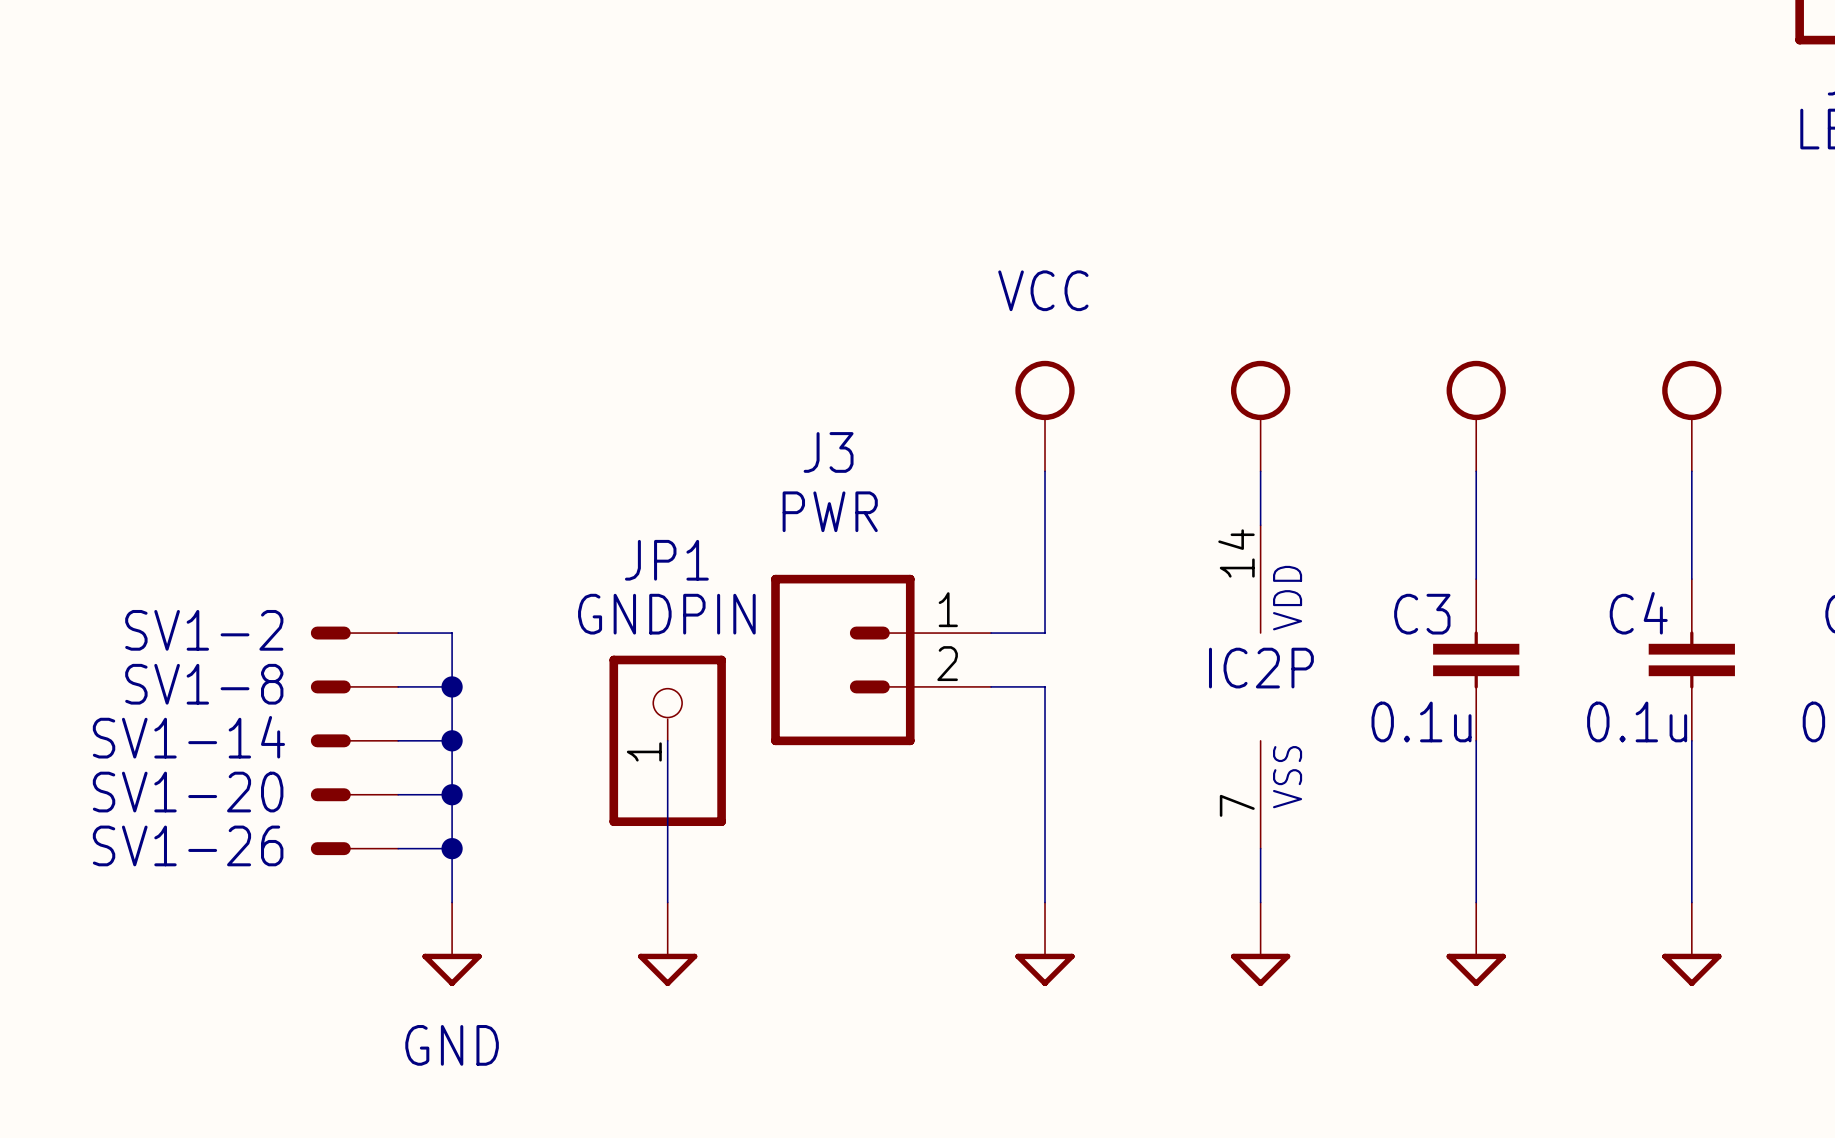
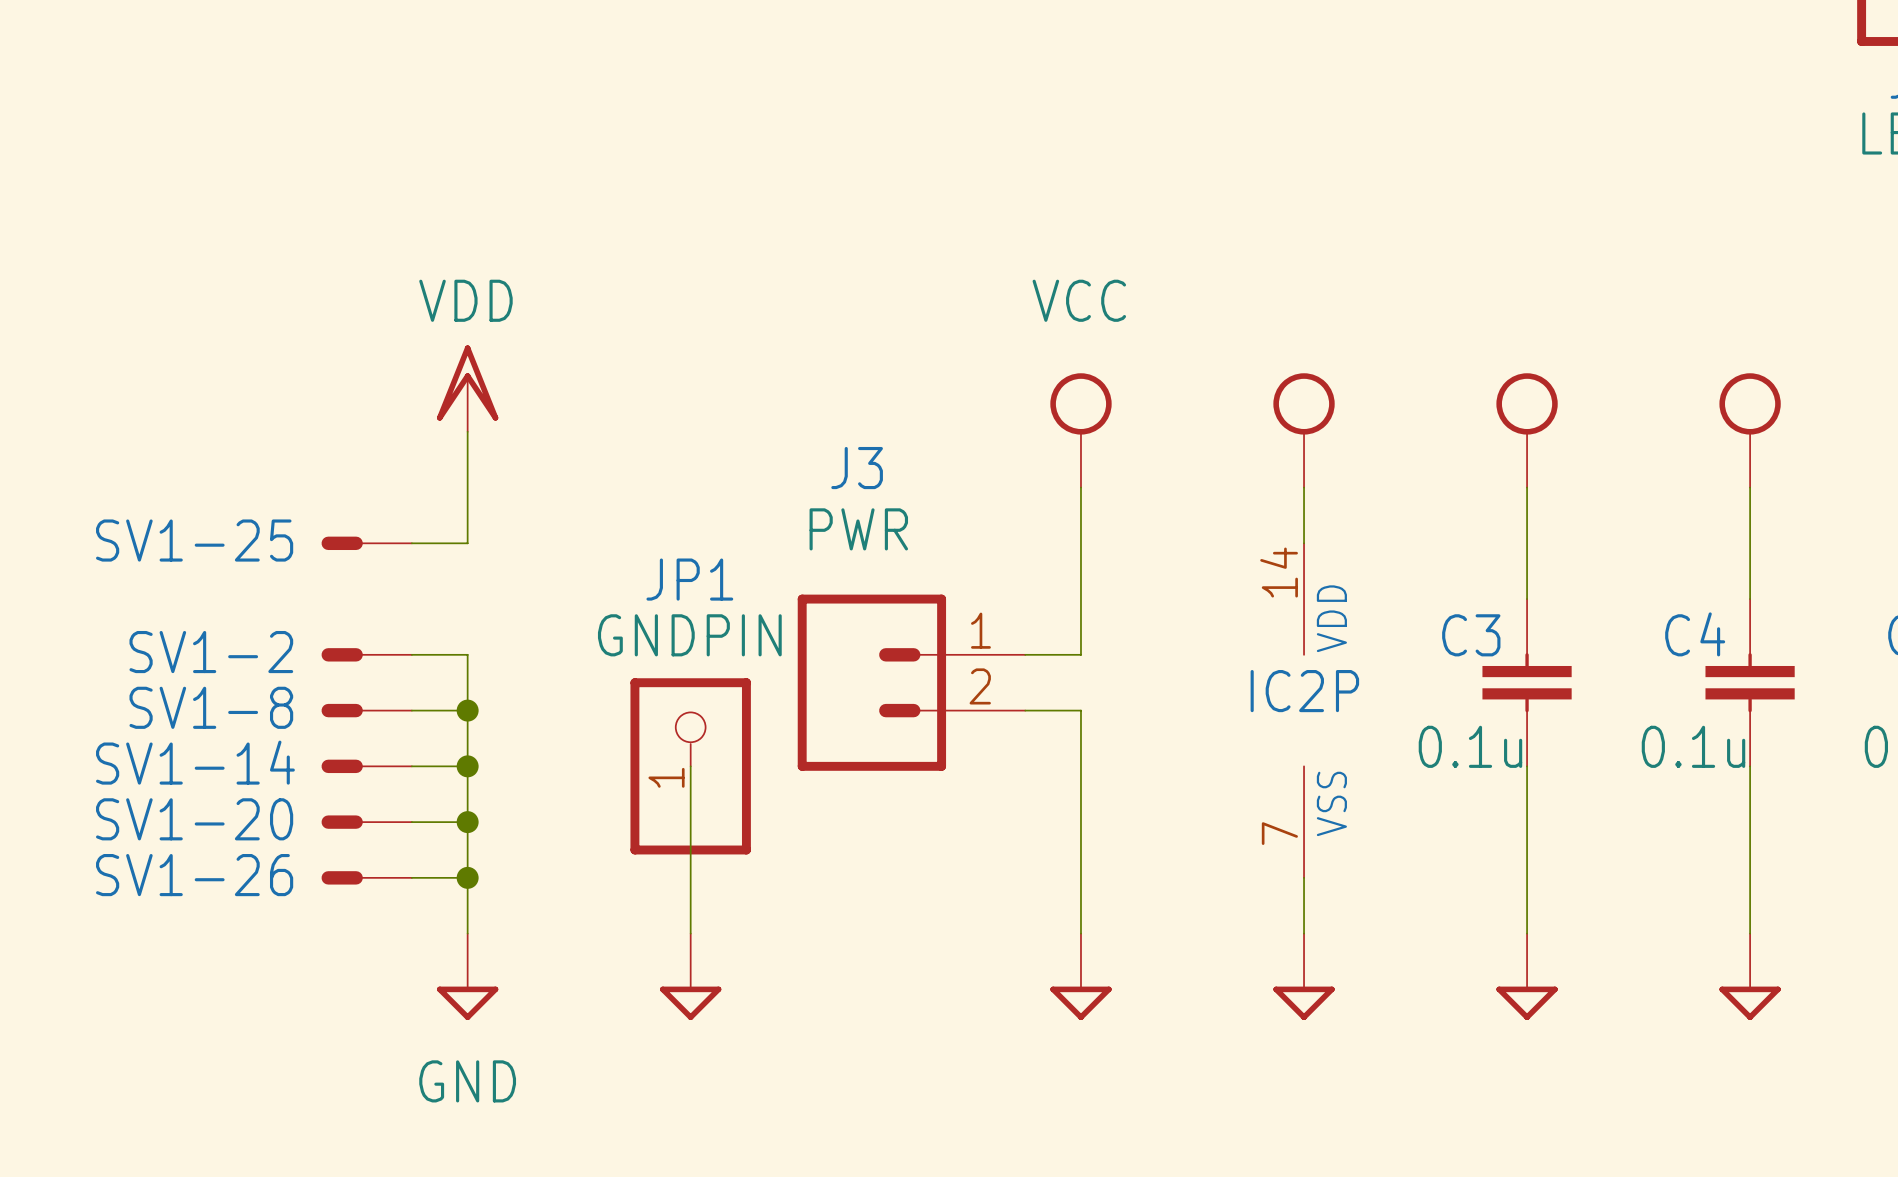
power symbol: none -> VDD (467, 388)
wire: none -> (467, 431) (467, 543) (411, 543)
SV1-25: none -> (366, 543)

